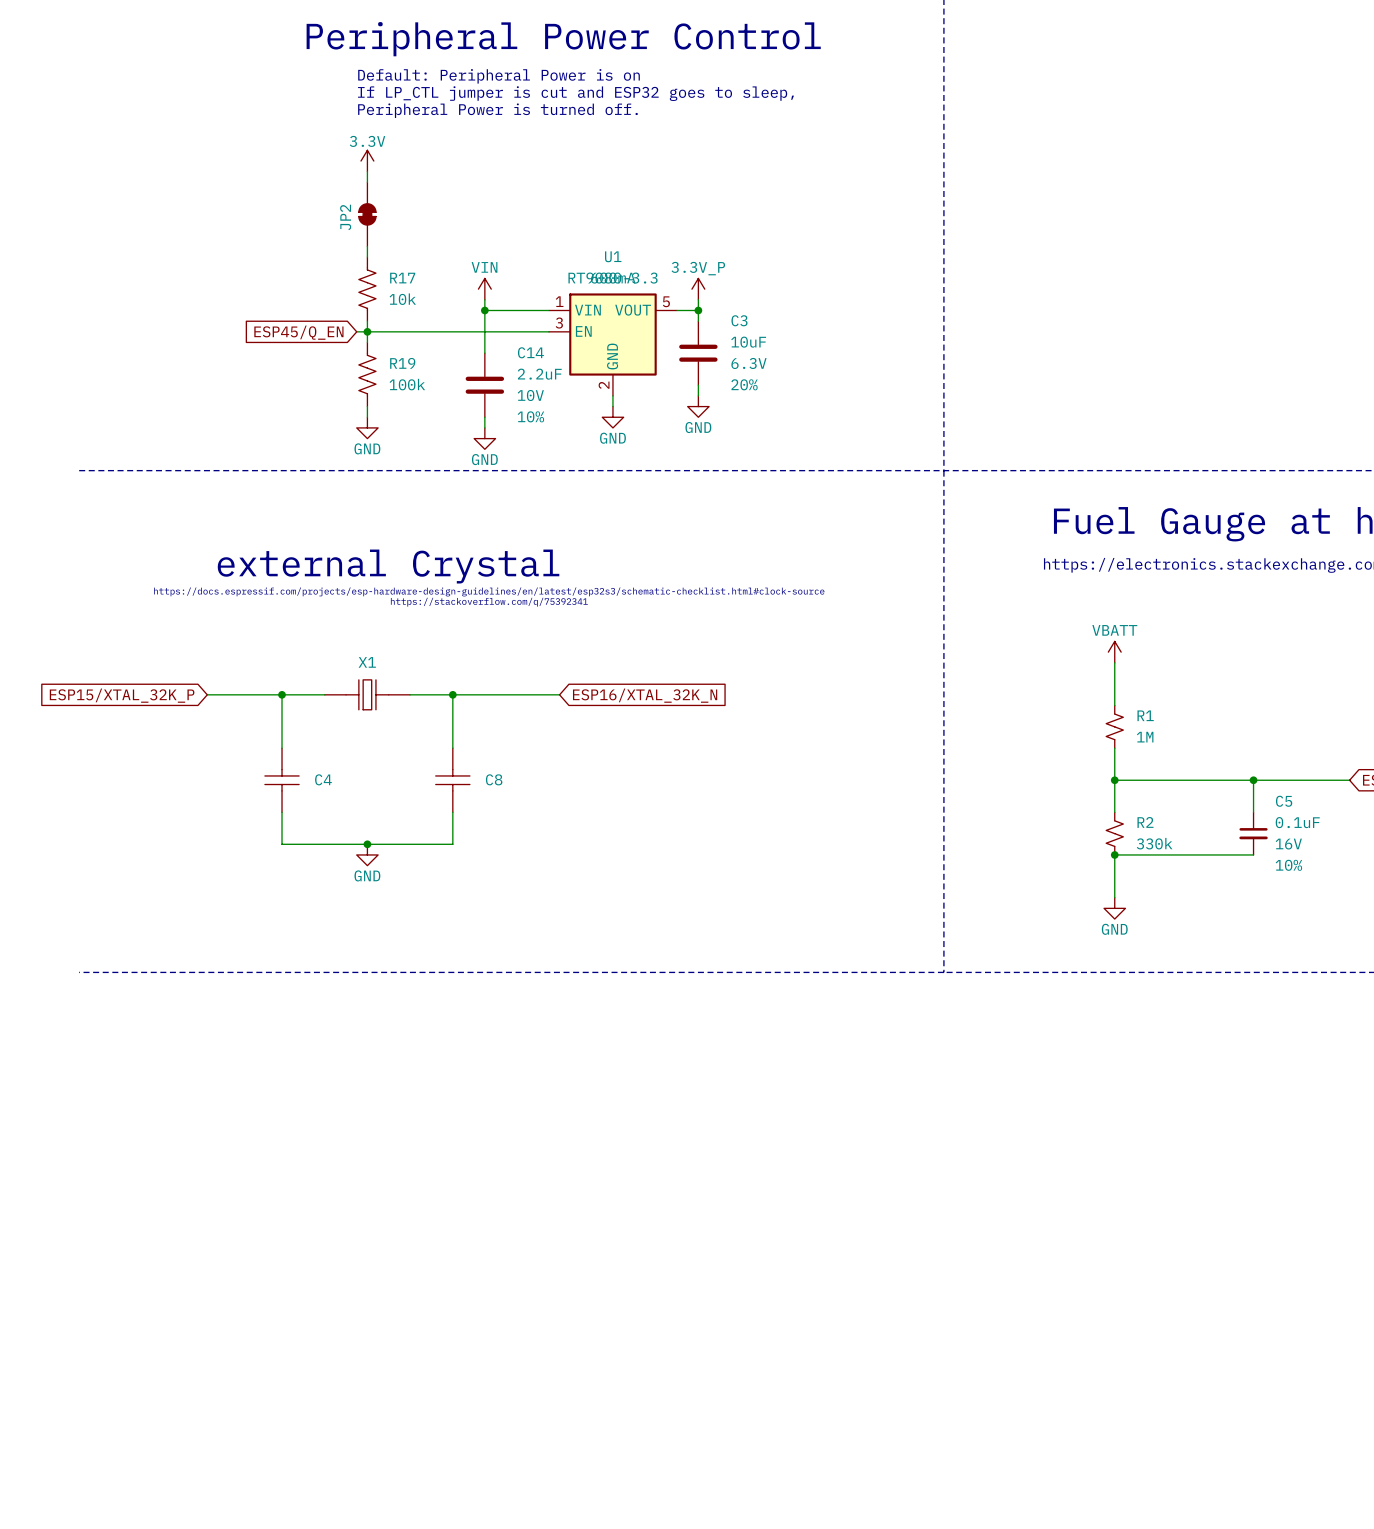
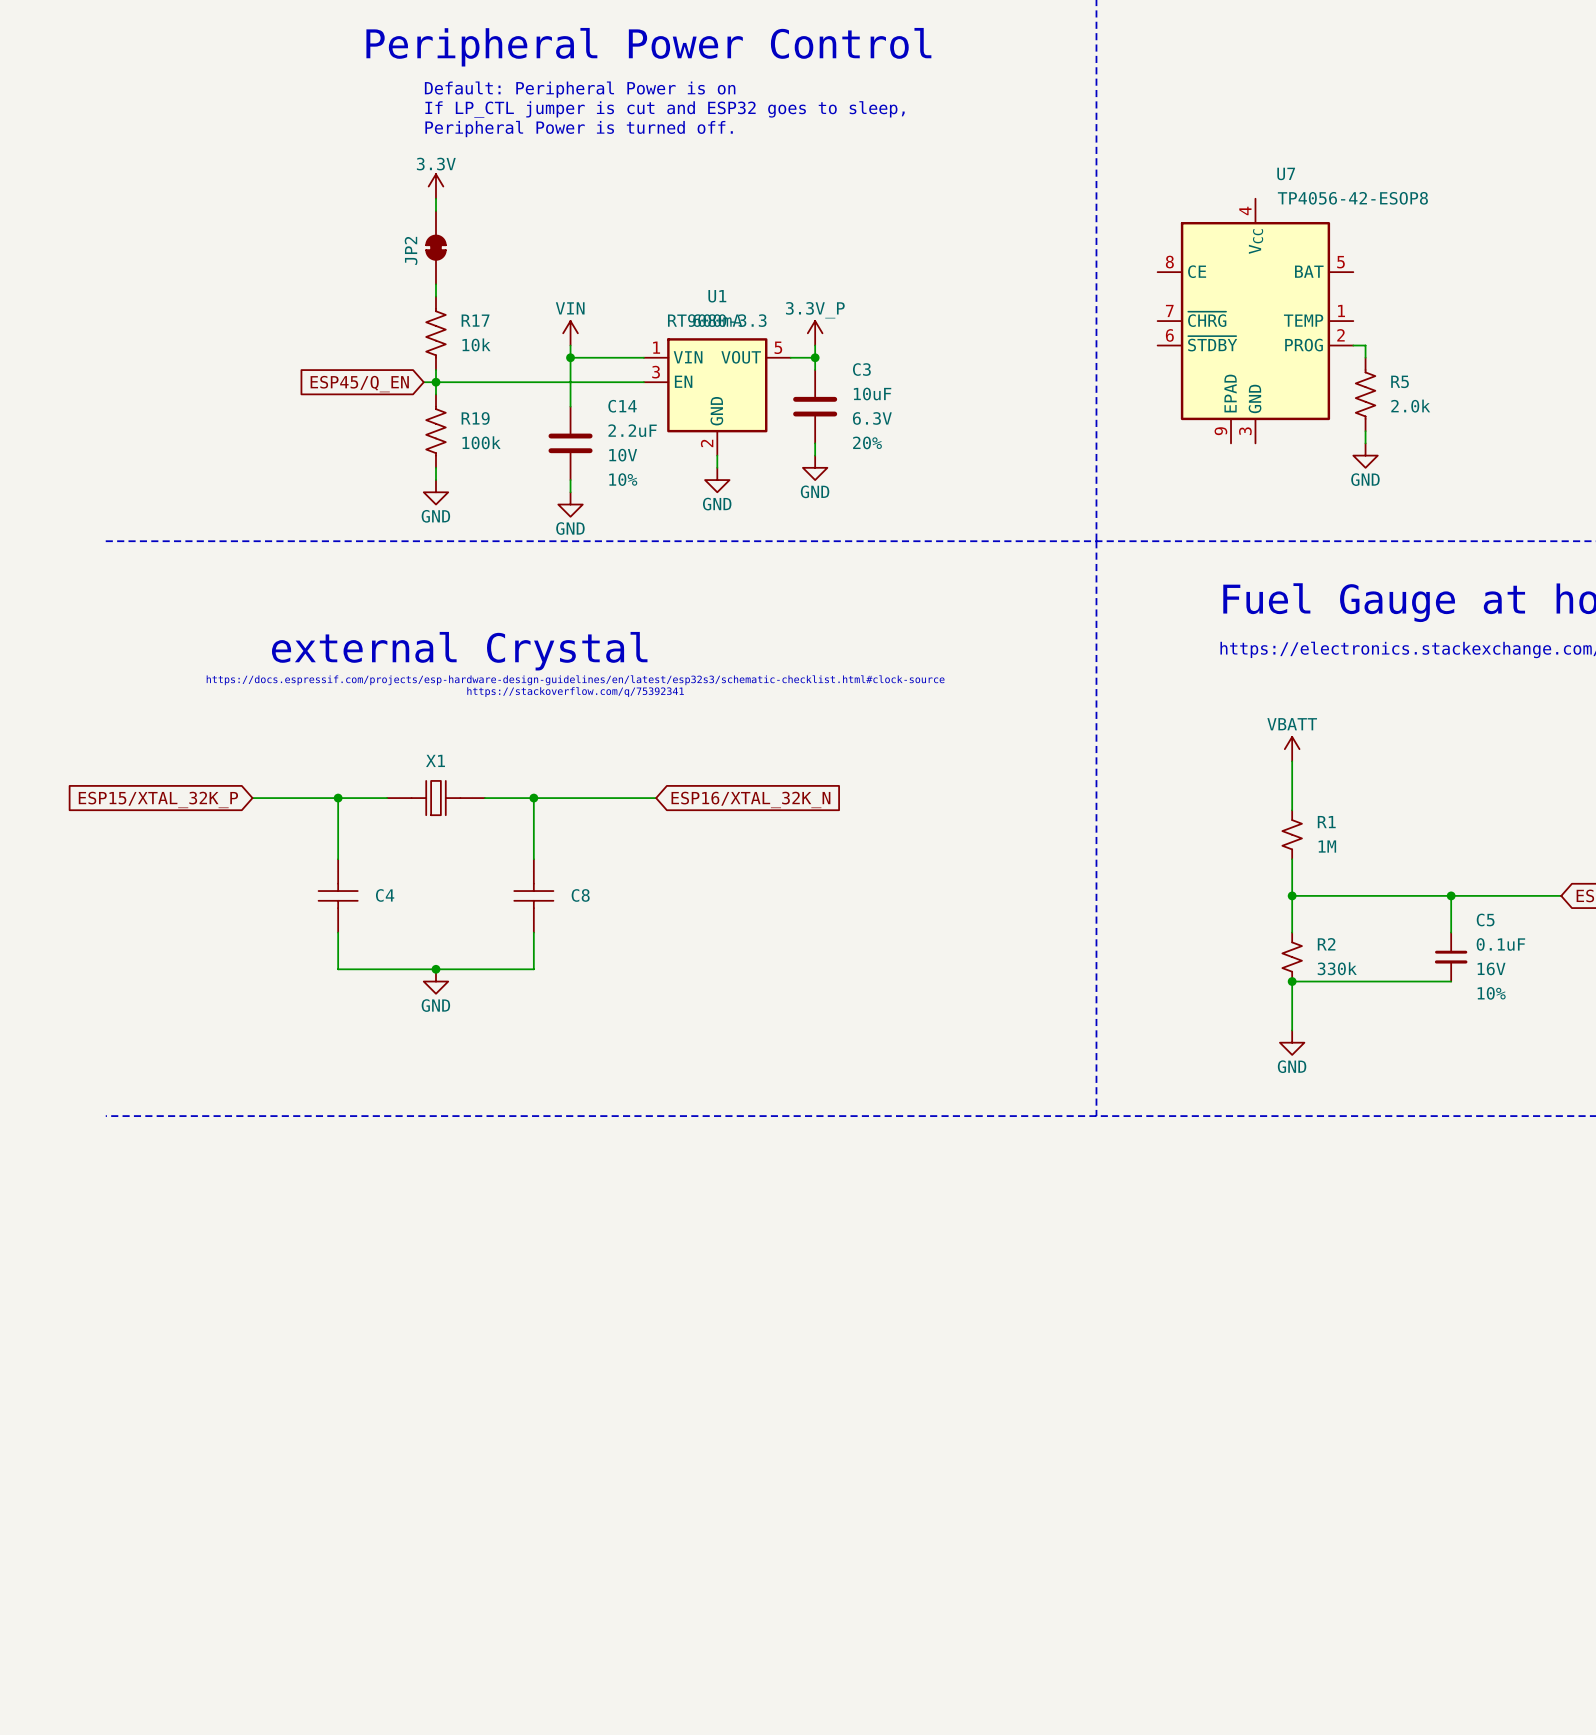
U7: none -> TP4056-42-ESOP8 (1255, 321)
wire: none -> (1353, 345) (1365, 345) (1365, 357)
R5: none -> 2.0k (1365, 394)
wire: none -> (1365, 431) (1365, 443)
power symbol: none -> GND (1365, 455)

